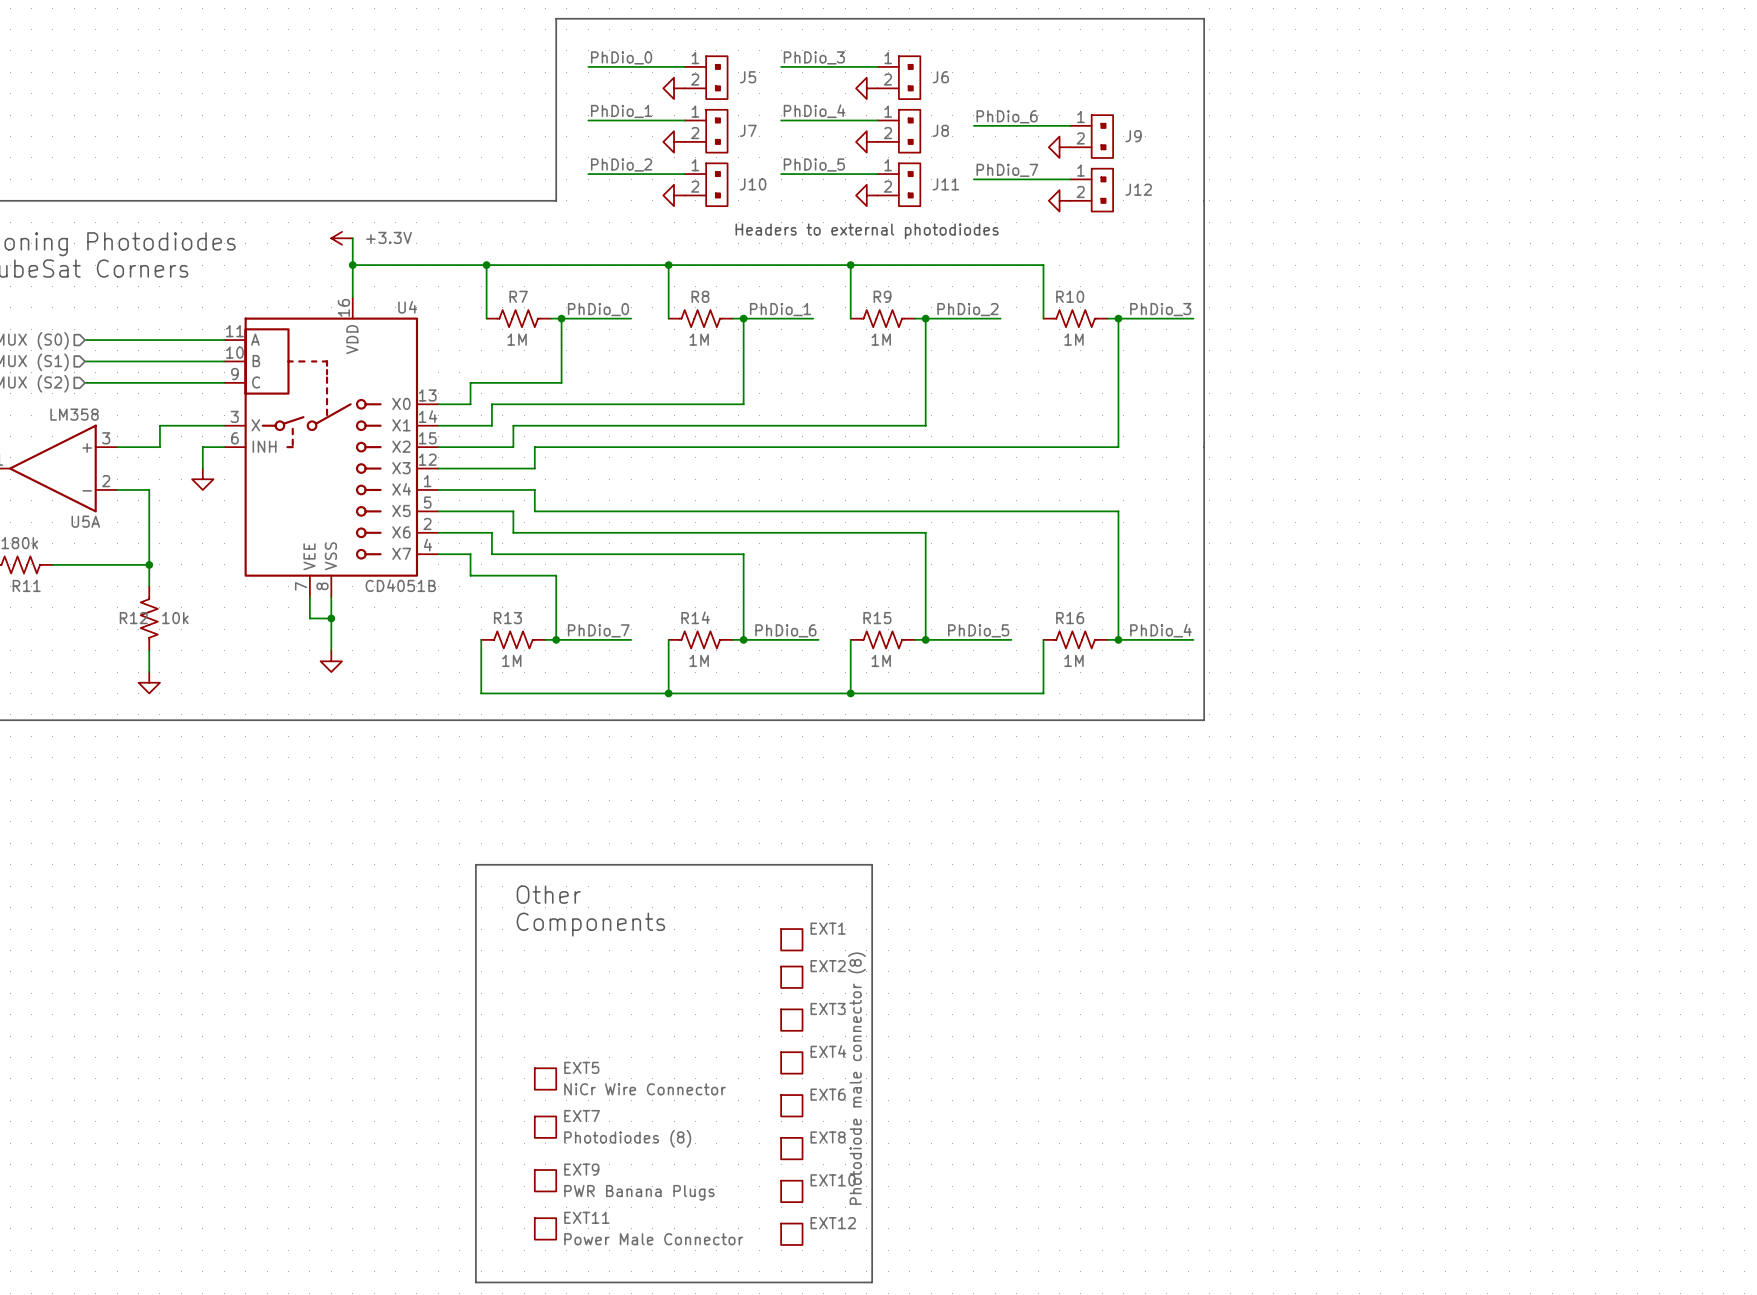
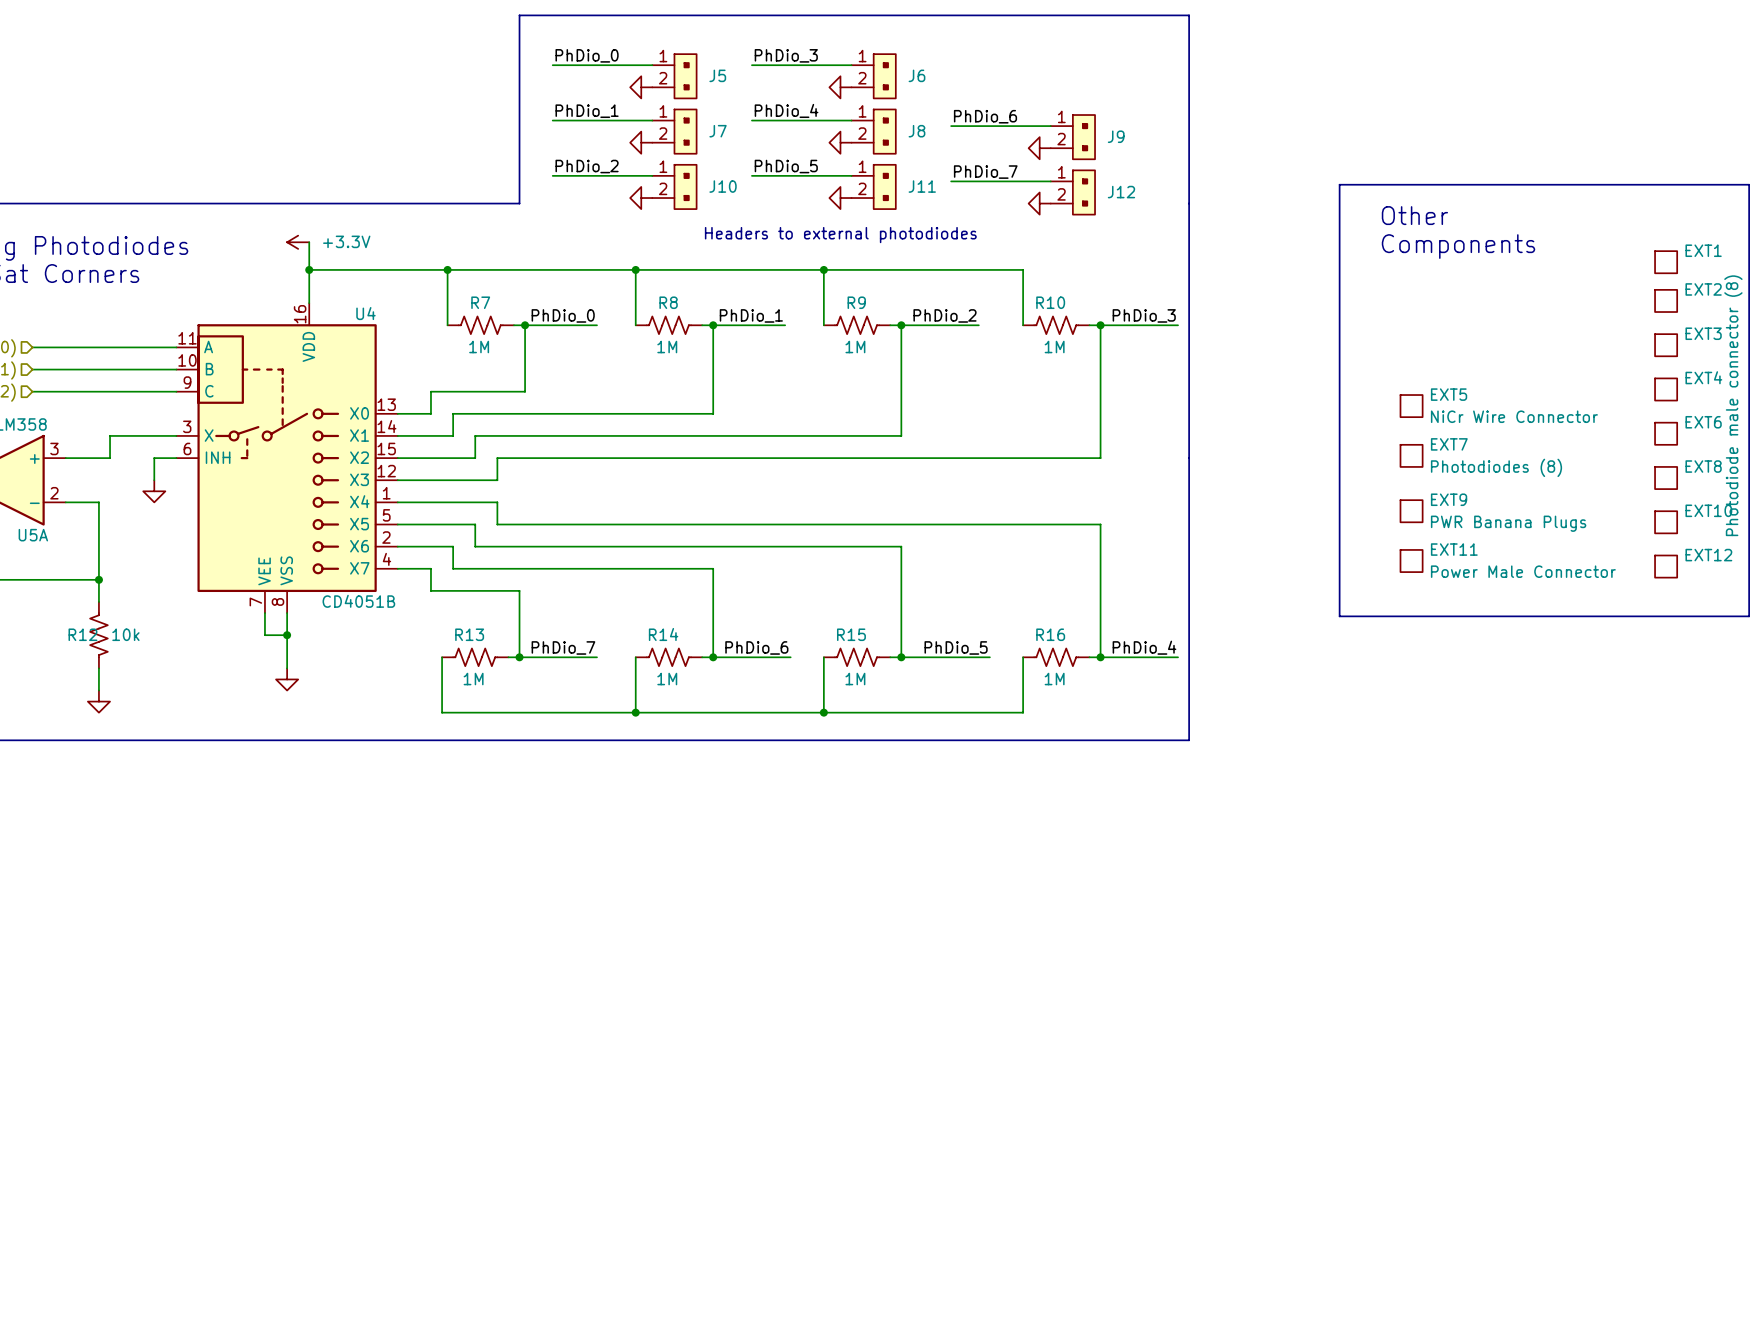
line: none -> (1339, 184) (1749, 184) (1749, 616) (1339, 616) (1339, 184)
text: none -> Other (1414, 215)
text: none -> Components (1458, 246)
line: (475, 864) (872, 864) (872, 1282) (475, 1282) (475, 864) -> none
text: Other (548, 894) -> none
text: Components (590, 924) -> none
EXT1 position: (791, 939) -> (1666, 262)
EXT2 position: (791, 977) -> (1666, 300)
EXT3 position: (791, 1020) -> (1666, 345)
EXT4 position: (791, 1062) -> (1666, 389)
EXT5 position: (545, 1078) -> (1411, 406)
EXT6 position: (791, 1105) -> (1666, 433)
EXT7 position: (545, 1127) -> (1411, 455)
EXT8 position: (791, 1148) -> (1666, 478)
EXT9 position: (545, 1180) -> (1411, 511)
EXT10 position: (791, 1191) -> (1666, 522)
EXT11 position: (545, 1228) -> (1411, 561)
EXT12 position: (791, 1234) -> (1666, 566)

